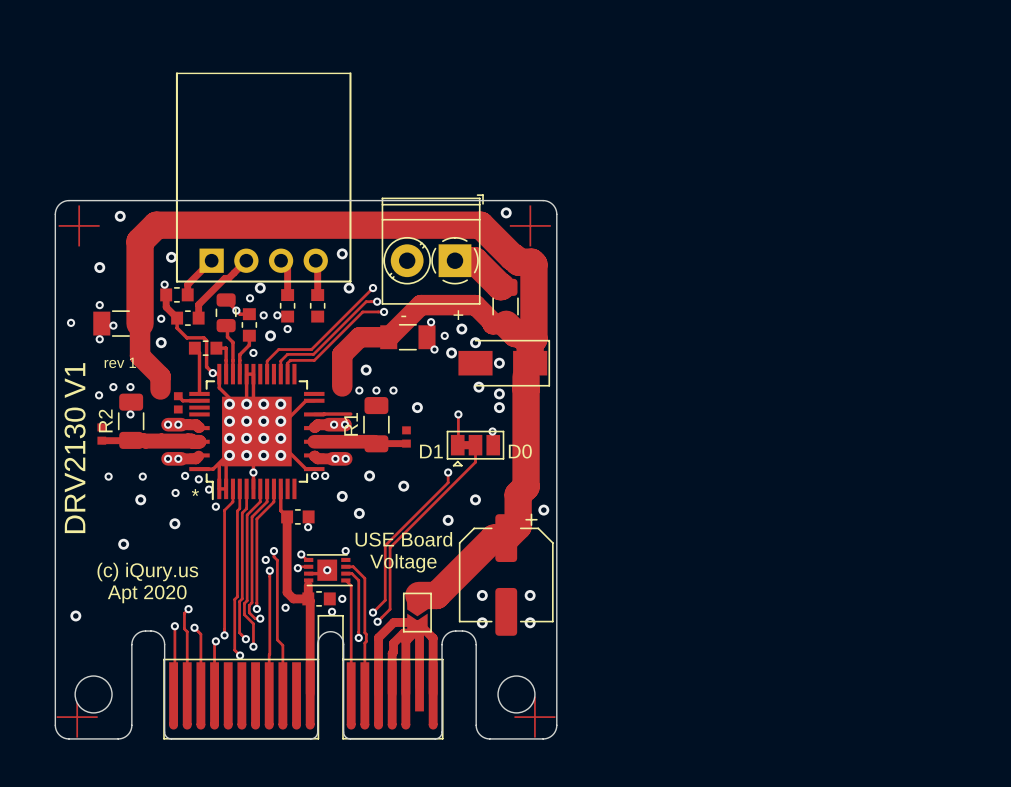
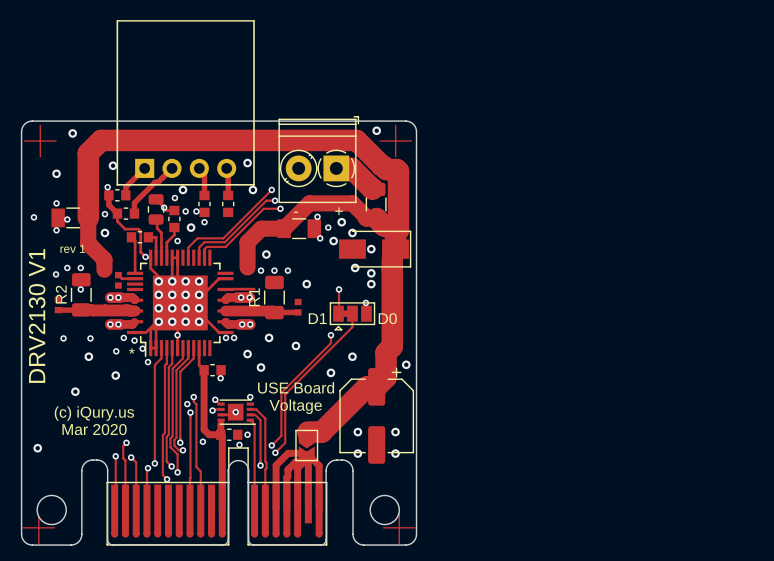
text: Apt 2020 (147, 594) -> Mar 2020 (94, 429)

